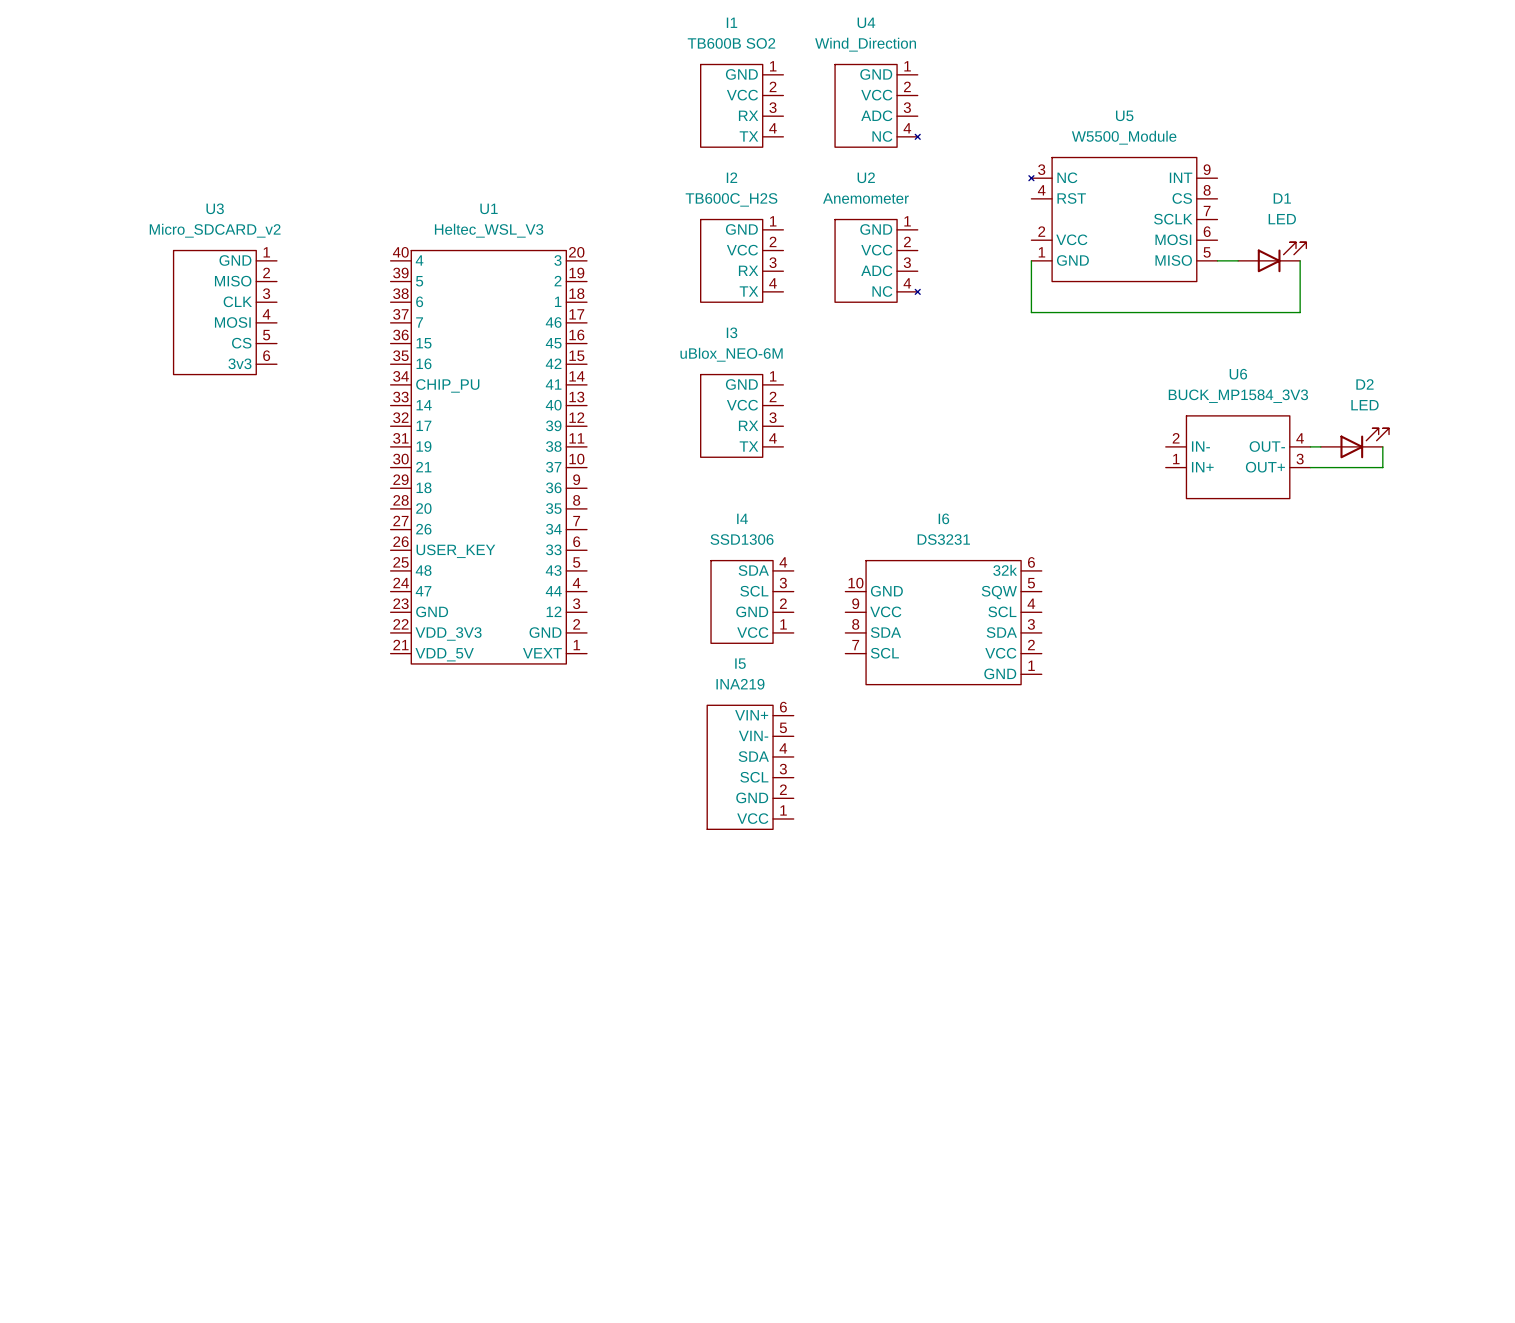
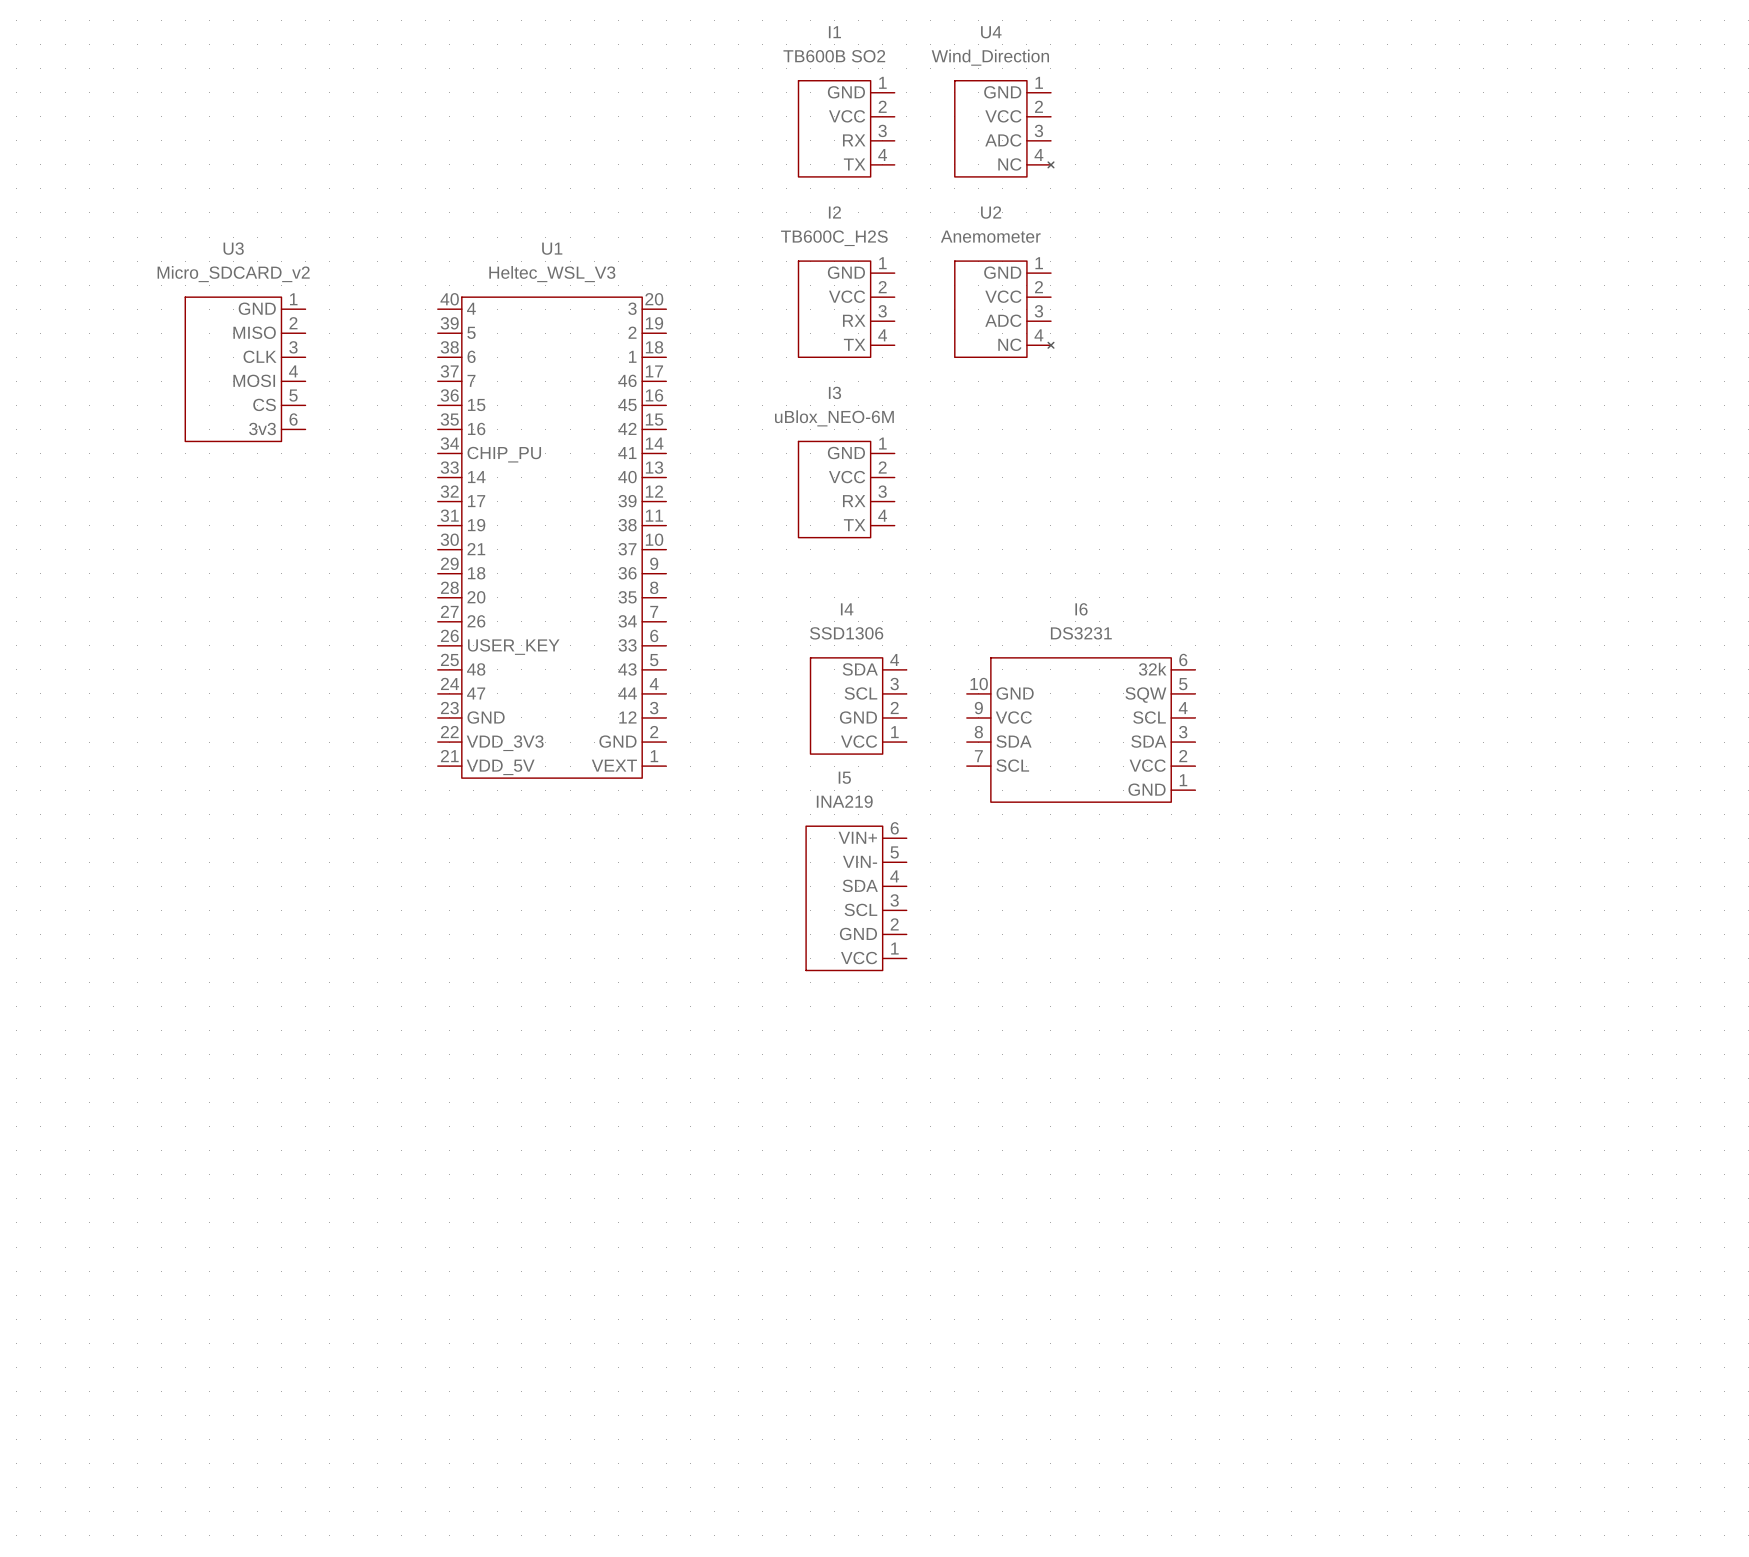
U5: W5500_Module (1123, 219) -> none
D1: LED (1272, 257) -> none
wire: (1031, 260) (1031, 312) (1300, 312) (1300, 260) -> none
wire: (1217, 260) (1238, 260) -> none
D2: LED (1354, 443) -> none
wire: (1310, 446) (1320, 446) -> none
wire: (1382, 446) (1382, 467) (1310, 467) -> none
U6: BUCK_MP1584_3V3 (1238, 457) -> none

